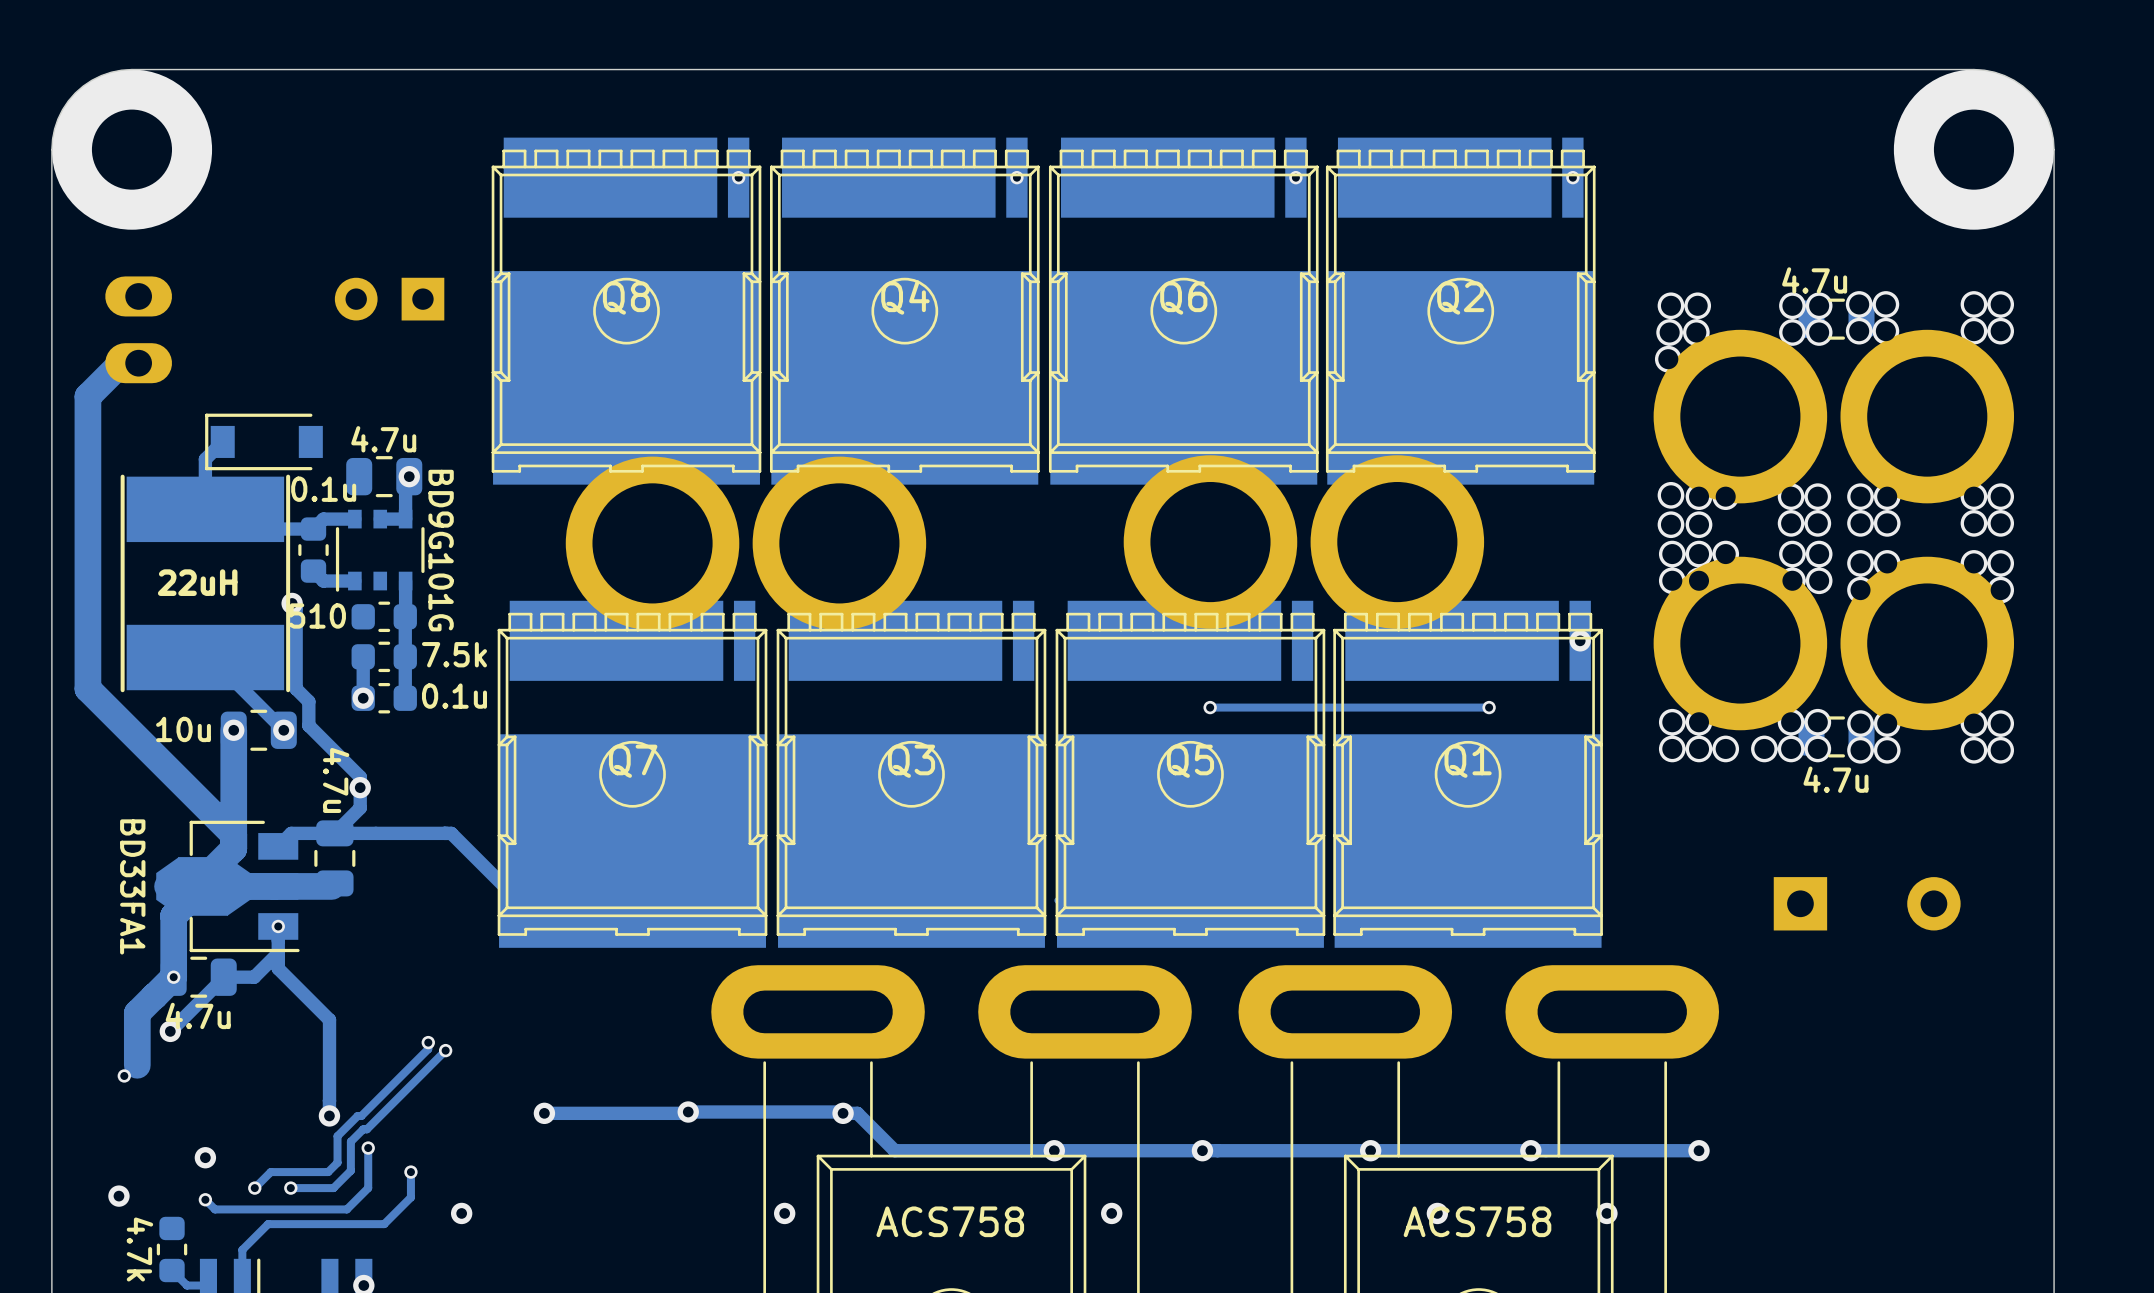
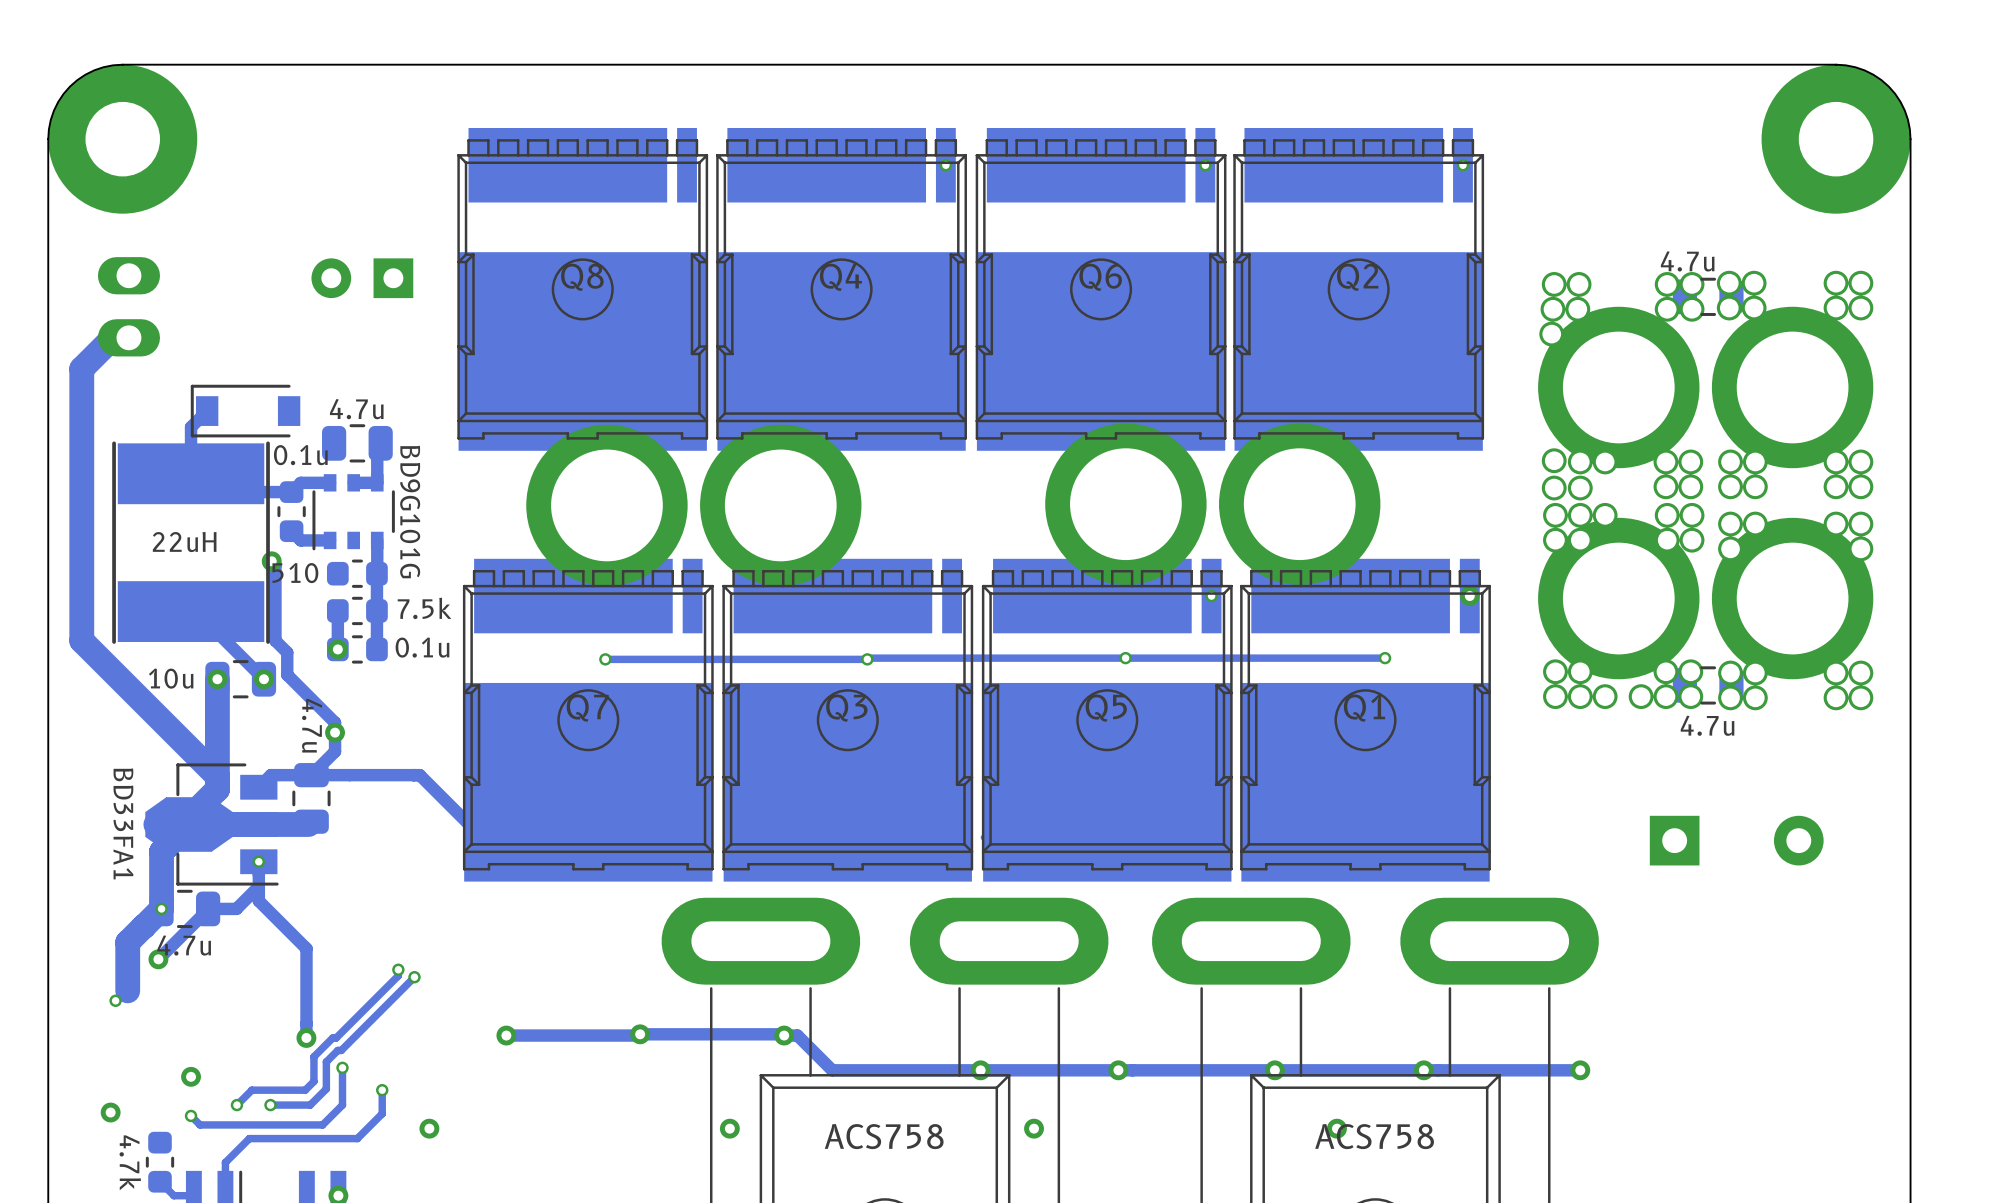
via: (738, 177) -> none
via: (409, 476) -> none
via: none -> (1211, 596)
track: none -> (1125, 658) (605, 659)
via: none -> (605, 659)
via: none -> (867, 659)
via: (1606, 1213) -> none

